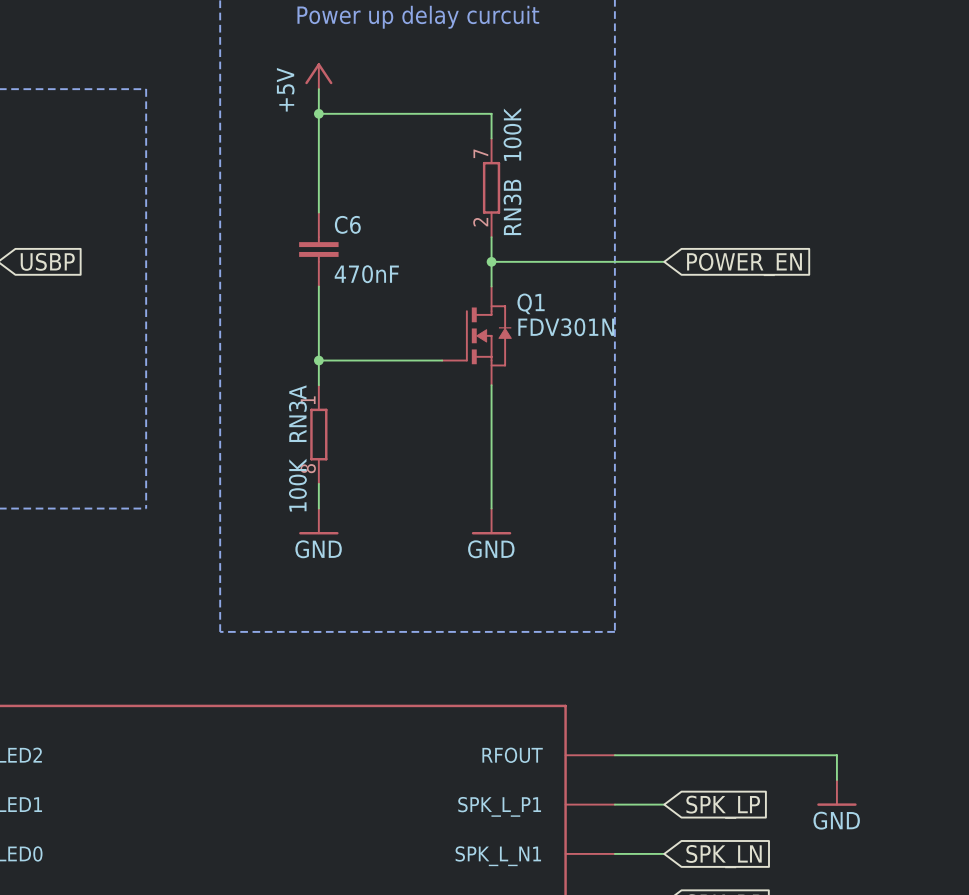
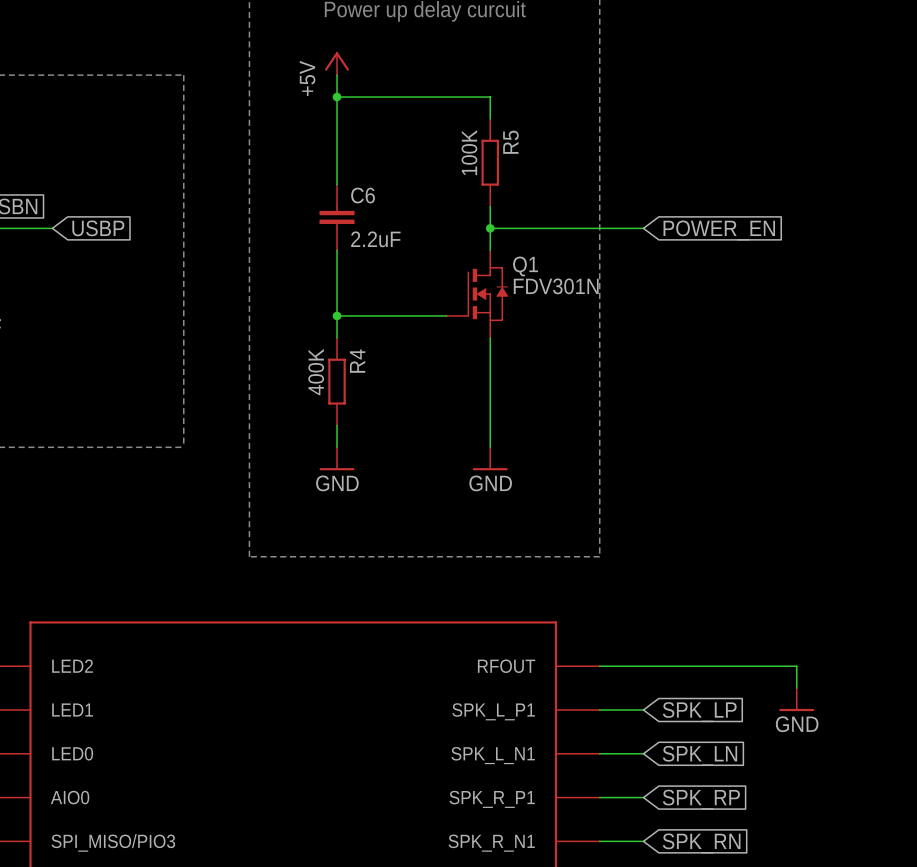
RN3B: 100K (491, 187) -> none
R5: none -> 100K (490, 162)
C6 value: 470nF (366, 274) -> 2.2uF (375, 239)
RN3A: 100K (318, 434) -> none
R4: none -> 400K (337, 381)

